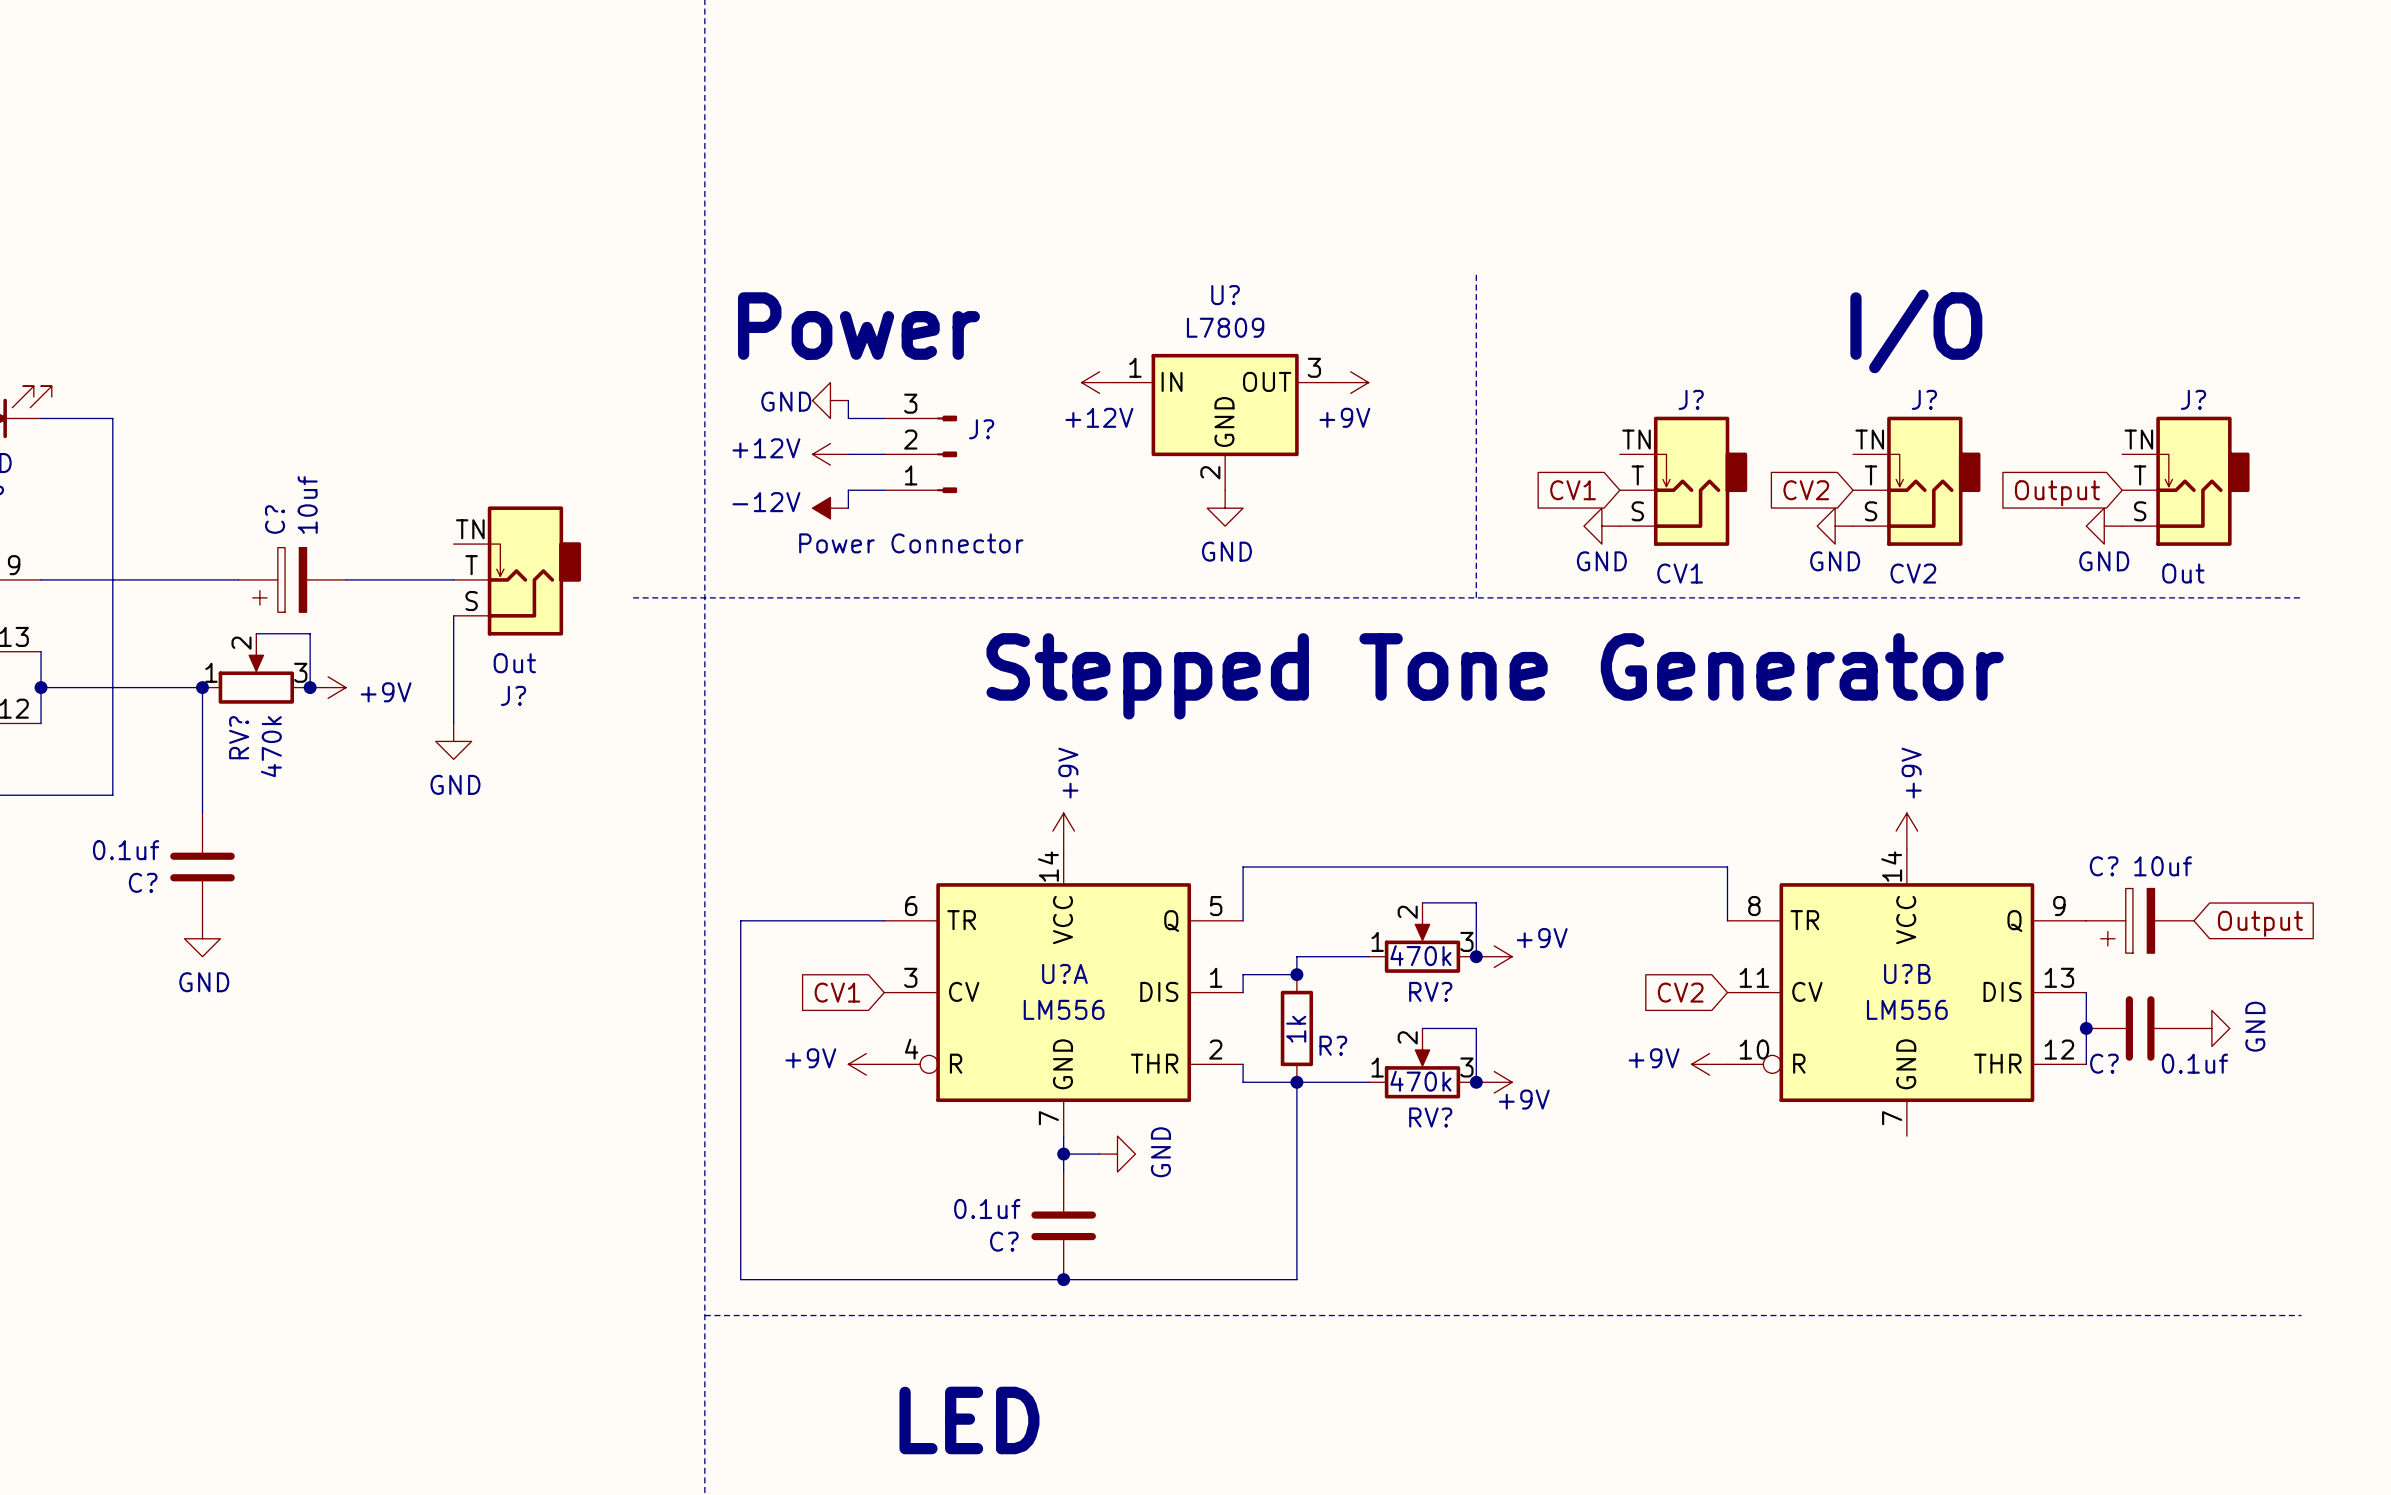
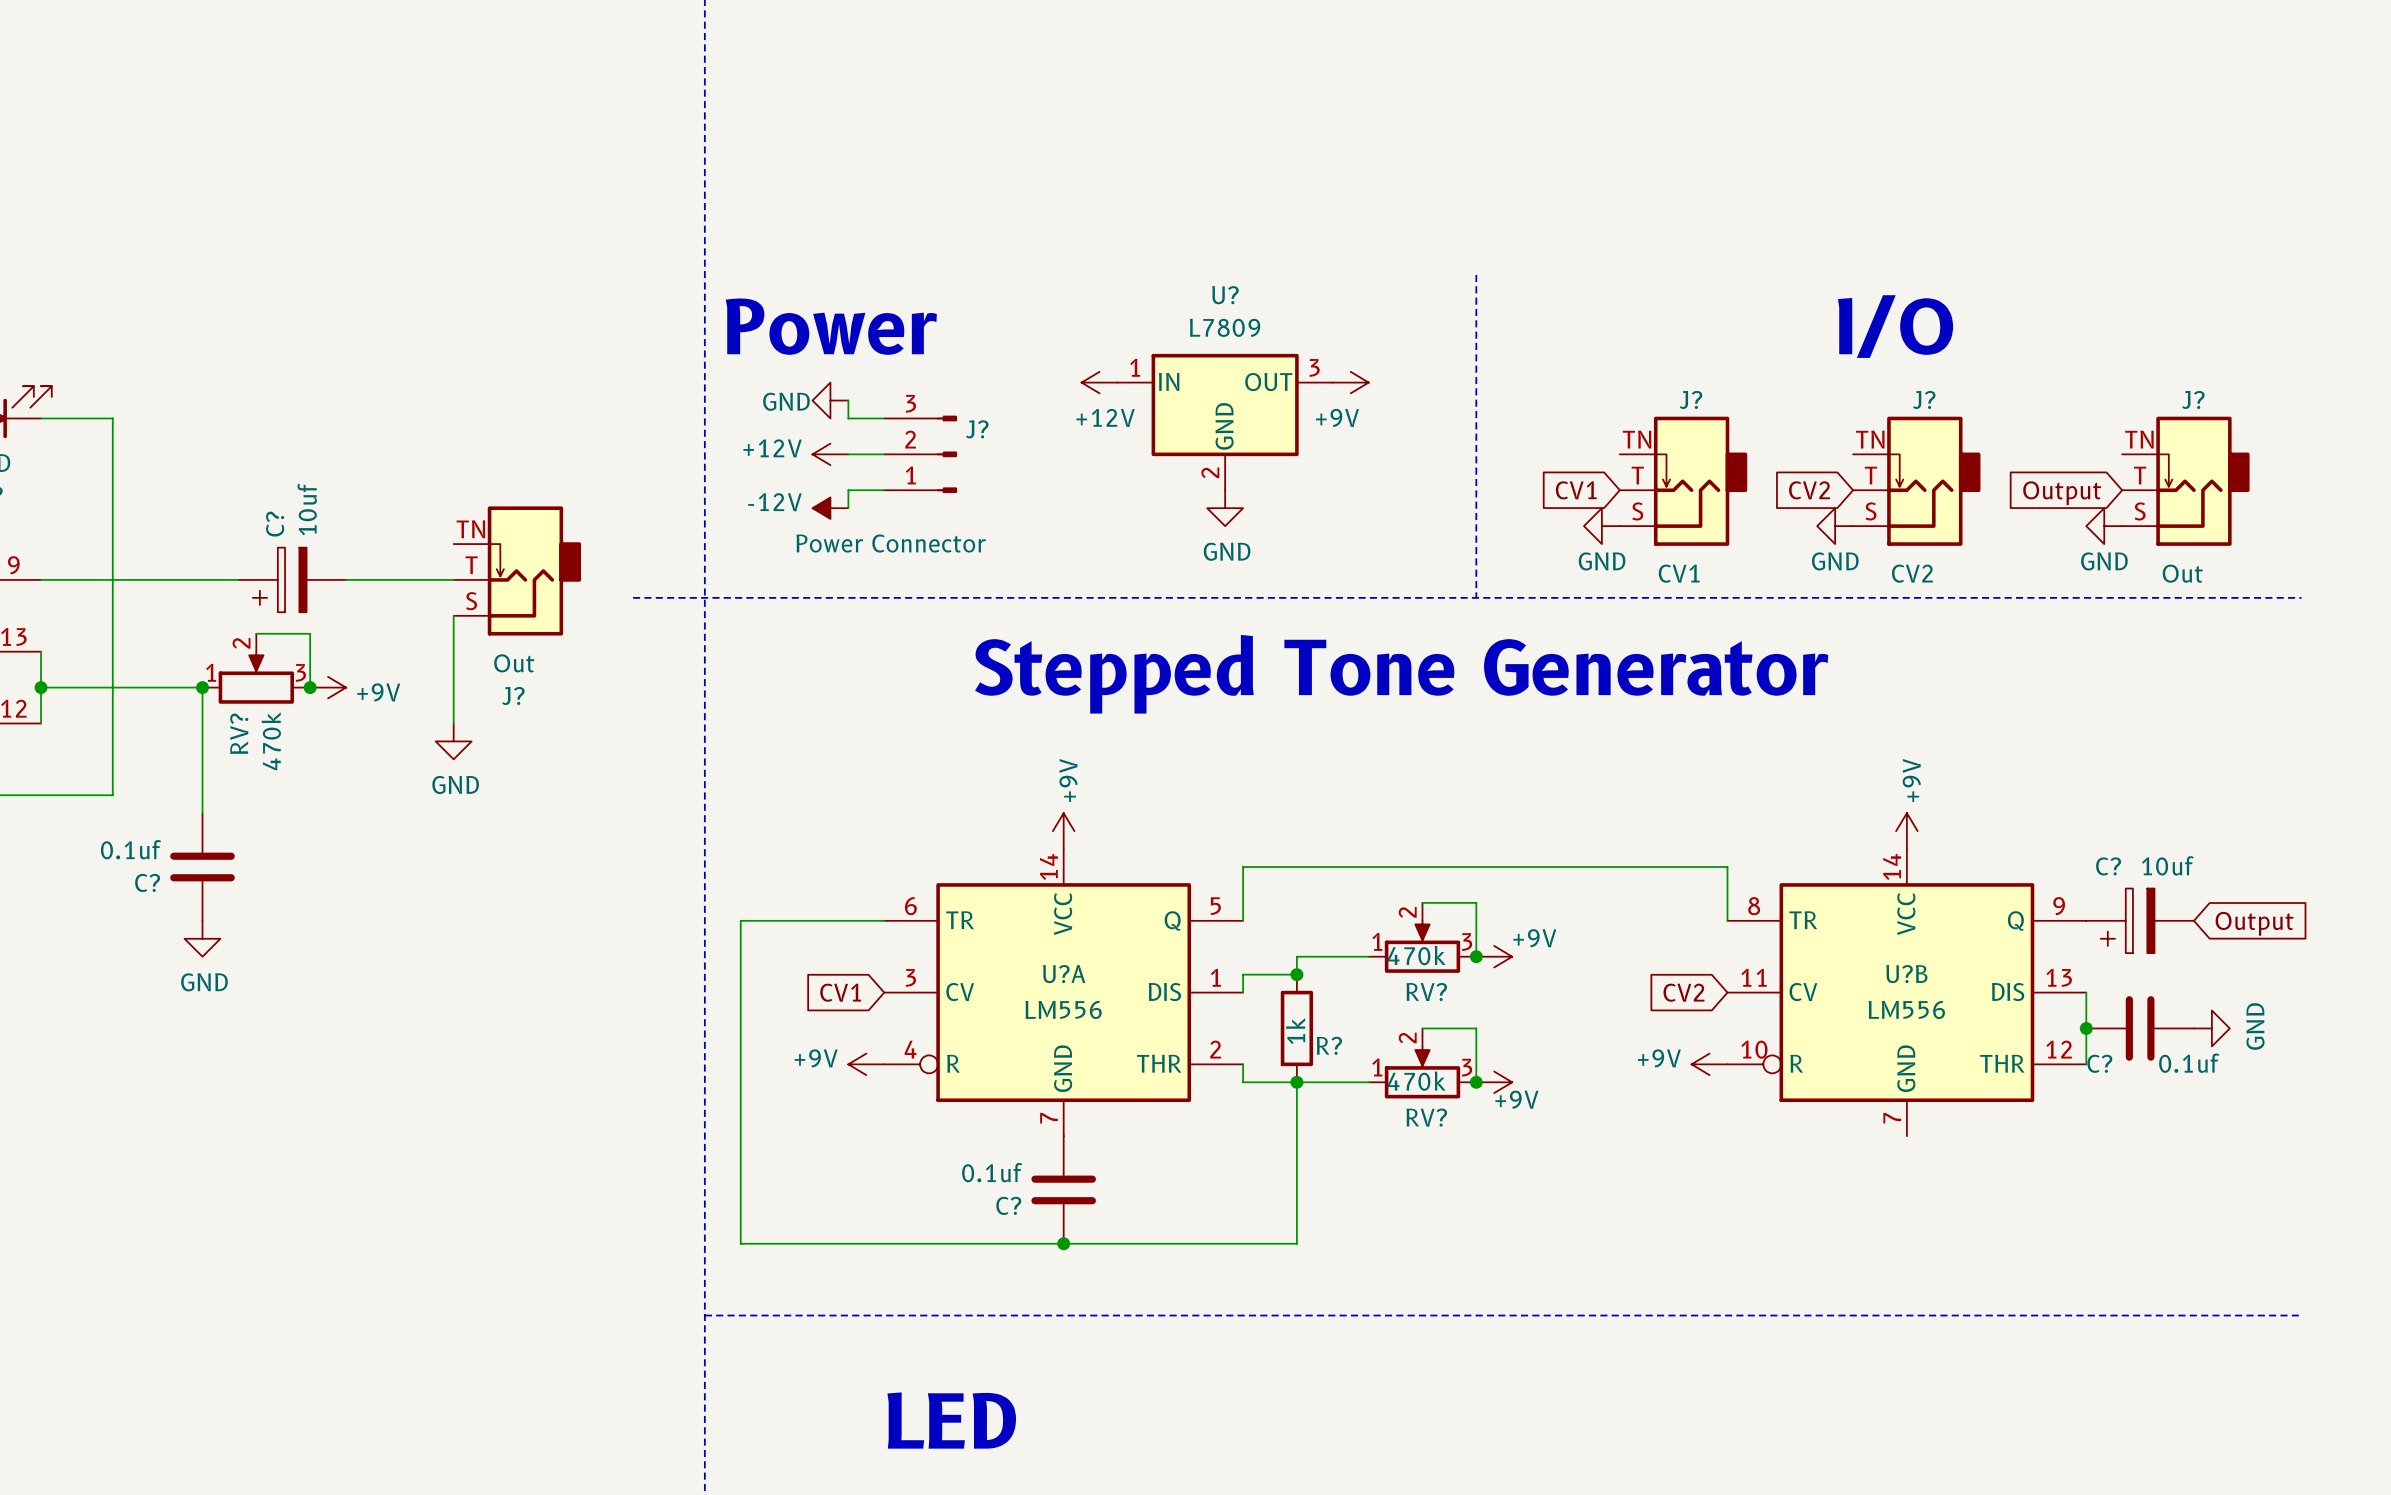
wire: (1063, 1154) (1099, 1154) -> none
junction: (1063, 1154) -> none
power symbol: GND (1117, 1154) -> none
C? position: (1063, 1225) -> (1063, 1189)
wire: (740, 1243) (740, 1279) (1296, 1279) (1296, 1243) -> (740, 1243) (1296, 1243)
junction position: (1063, 1279) -> (1063, 1243)

